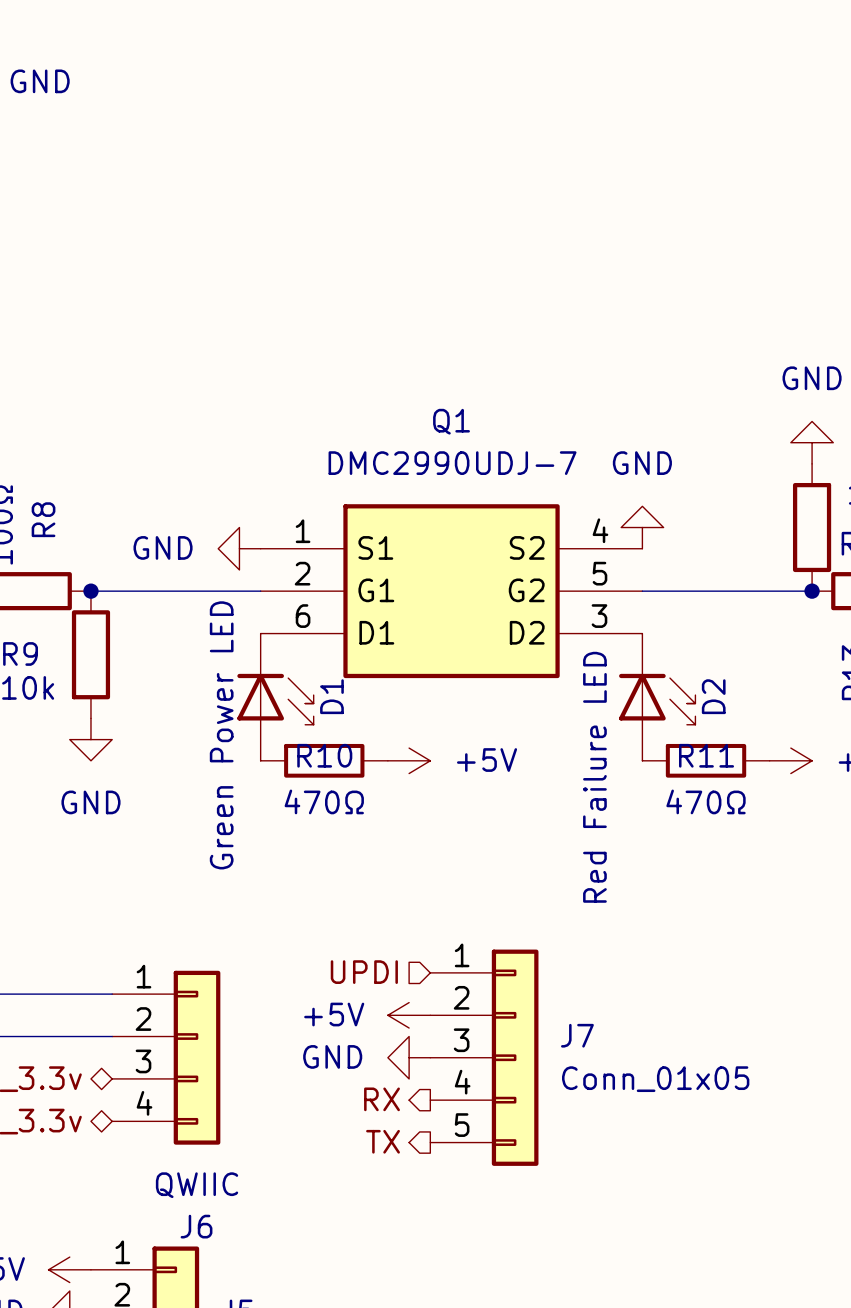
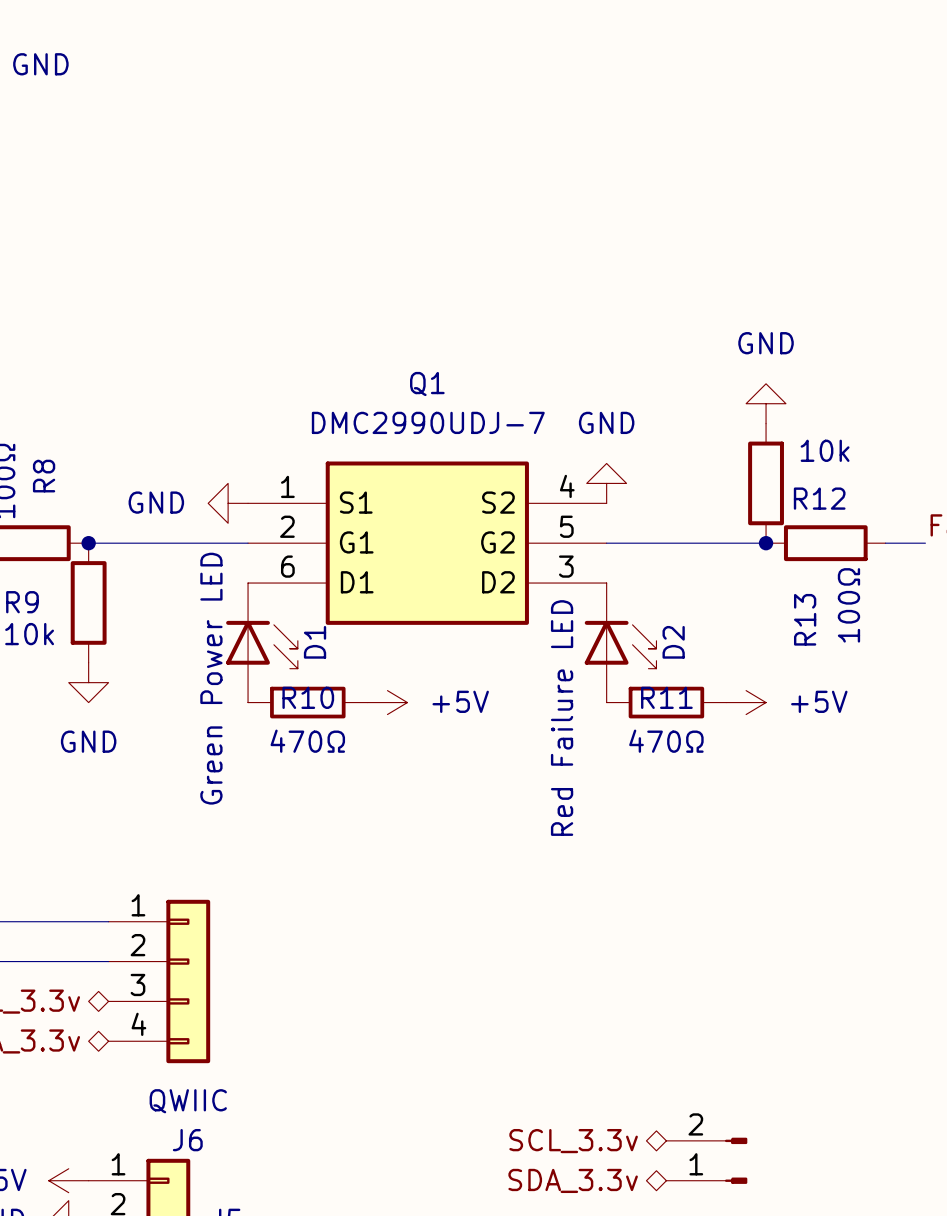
hierarchical label: UPDI (364, 972) -> none
power symbol: +5V (409, 1015) -> none
power symbol: GND (409, 1057) -> none
J7: Conn_01x05 (484, 1057) -> none
hierarchical label: RX (382, 1099) -> none
hierarchical label: TX (383, 1141) -> none
hierarchical label: none -> SCL_3.3v (573, 1141)
part: none -> (706, 1160)
hierarchical label: none -> SDA_3.3v (573, 1180)

